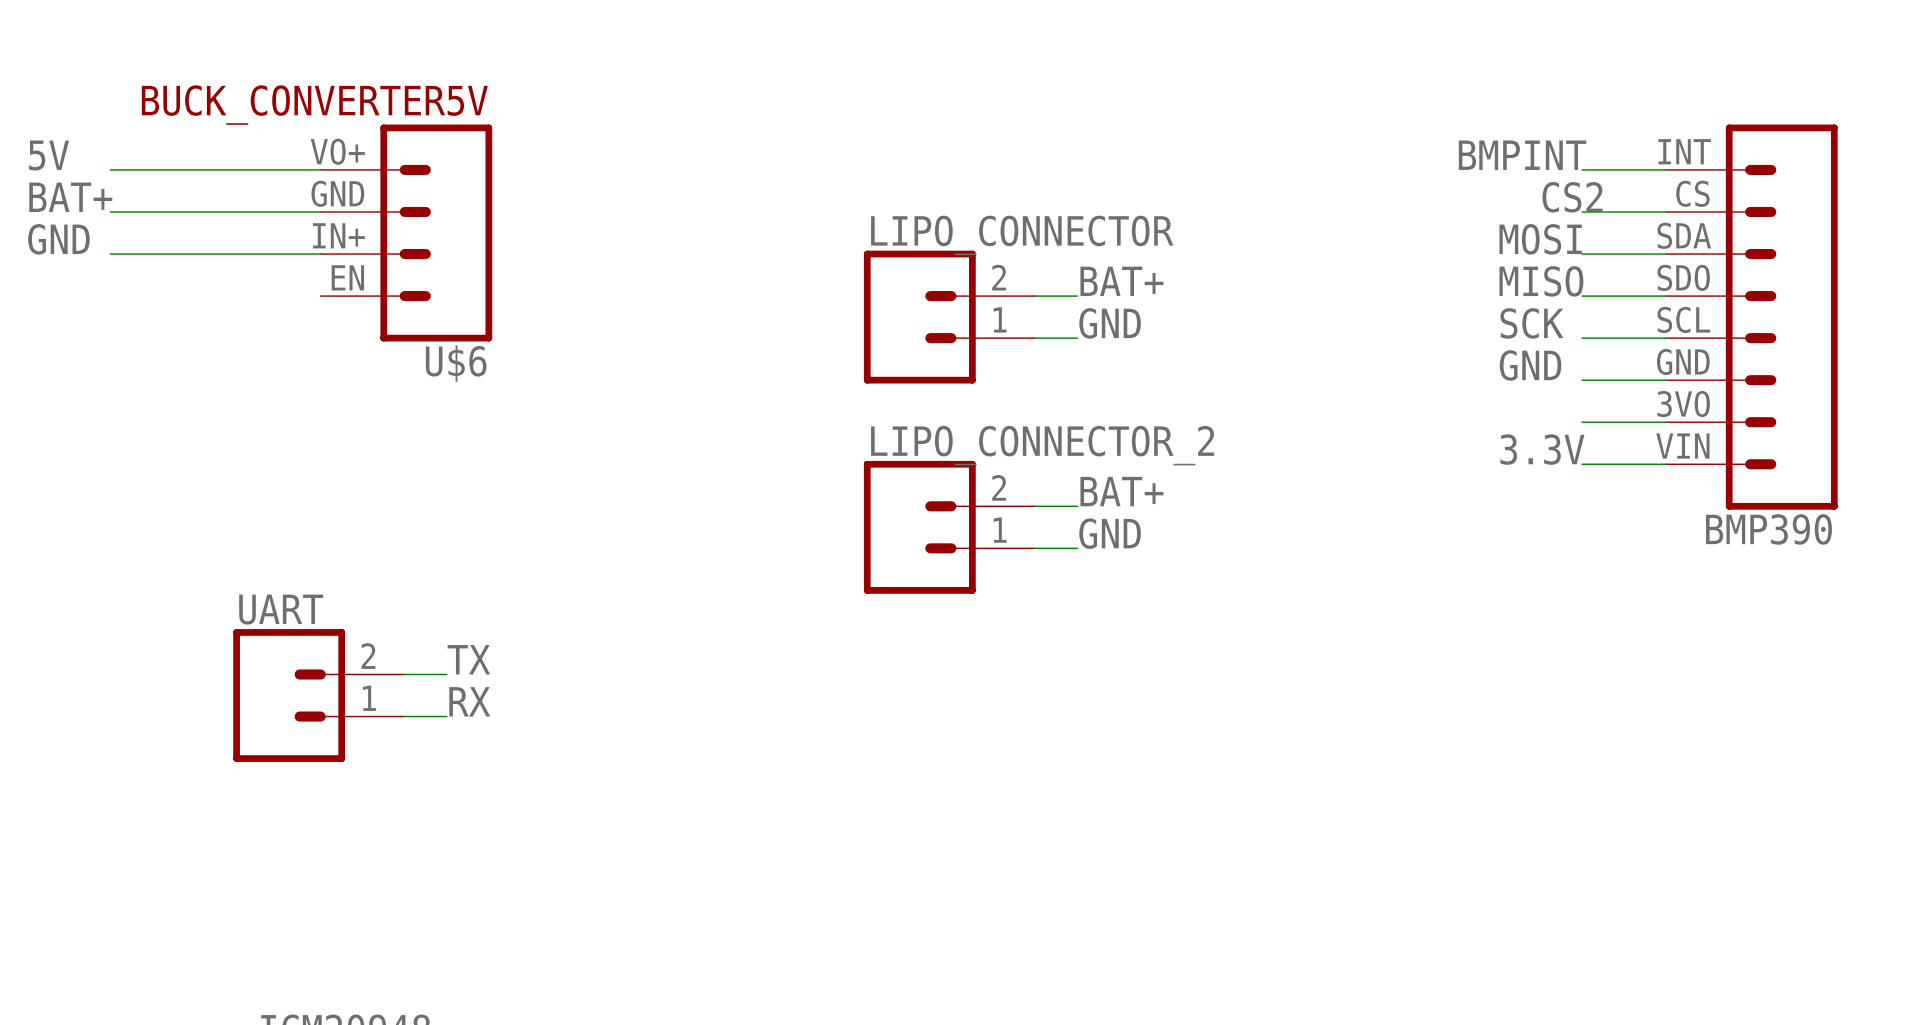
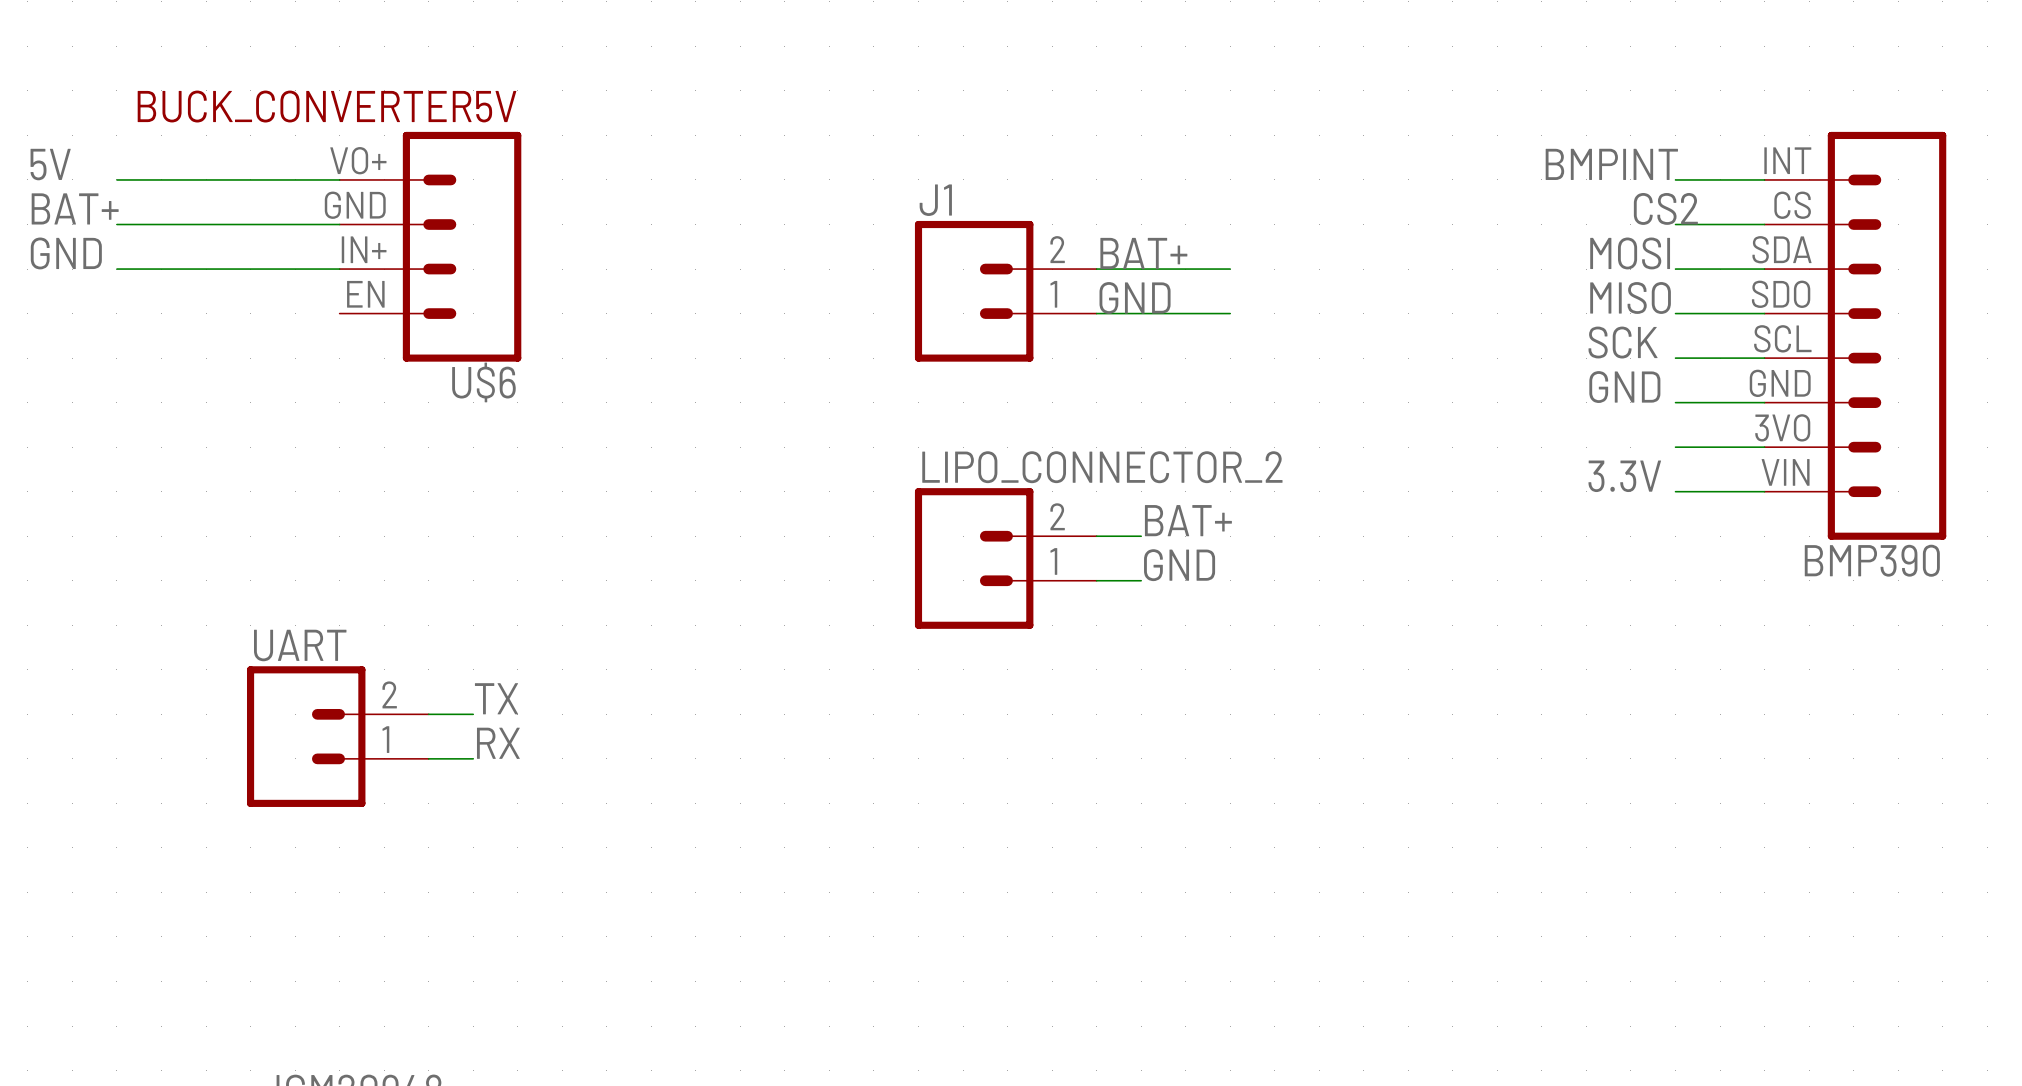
wire: none -> (1096, 269) (1230, 269)
J1: none -> (1005, 291)
label position: BAT+ (1121, 281) -> BAT+ (1143, 253)
wire: none -> (1141, 313) (1230, 313)
LIPO_CONNECTOR: (949, 317) -> none
label position: GND (1110, 323) -> GND (1135, 297)
wire: (1035, 338) (1077, 338) -> none

